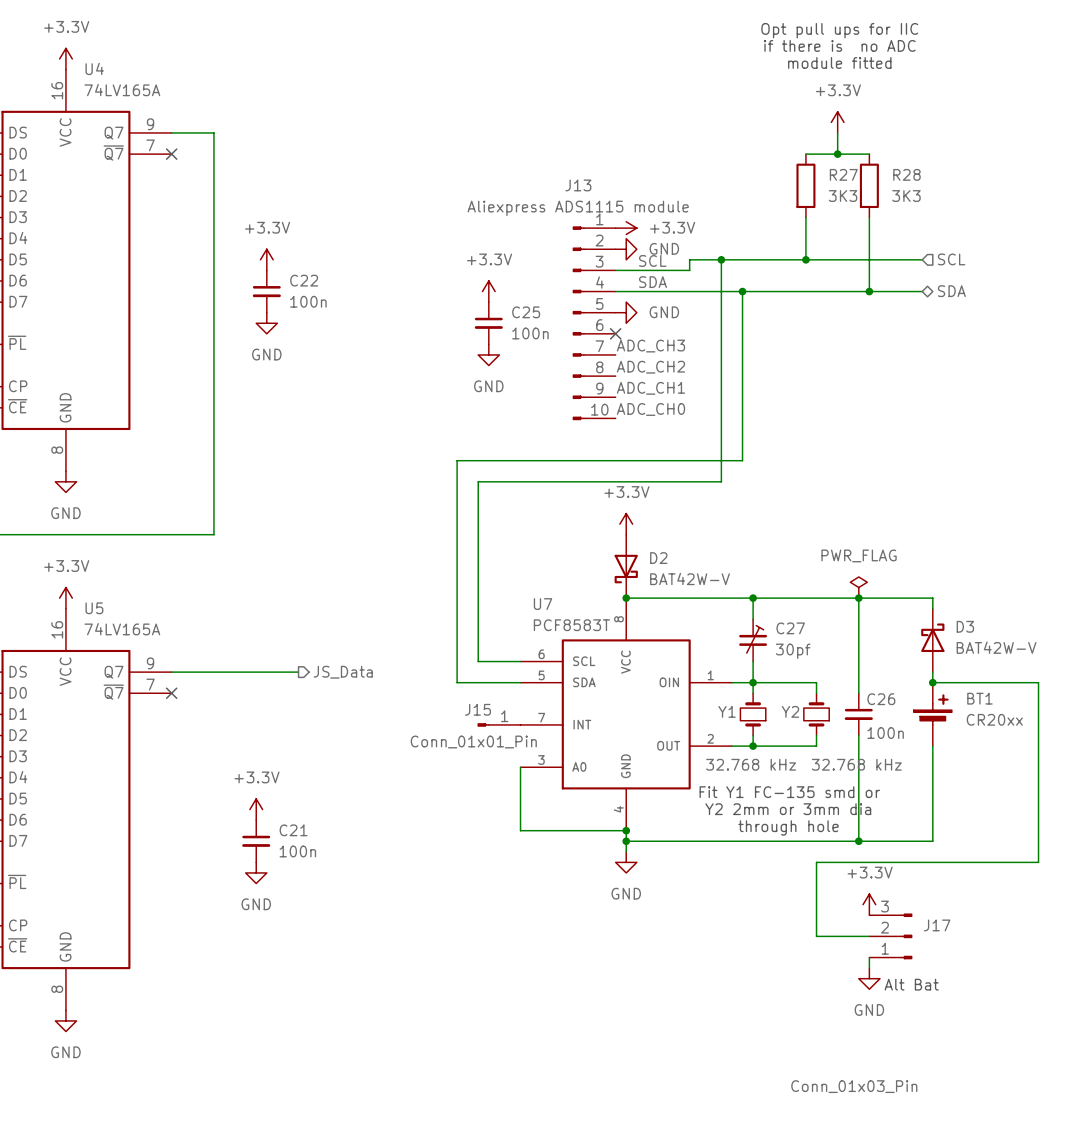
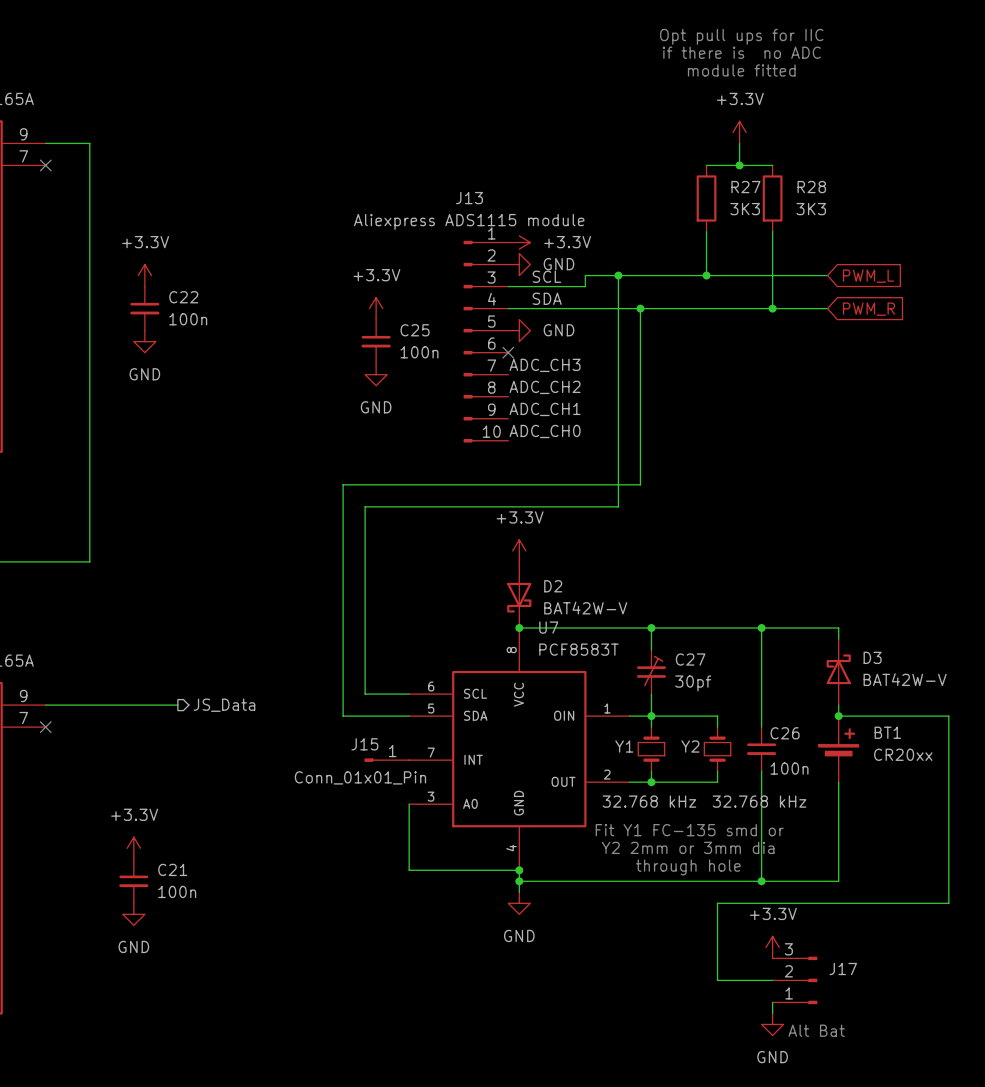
hierarchical label: SCL (951, 259) -> none
global label: none -> PWM_L (868, 276)
hierarchical label: SDA (951, 291) -> none
global label: none -> PWM_R (868, 309)
power symbol: PWR_FLAG (858, 587) -> none
U7 name position: U7 (543, 604) -> U7 (548, 627)
U7 value position: PCF8583T (571, 625) -> PCF8583T (578, 649)

